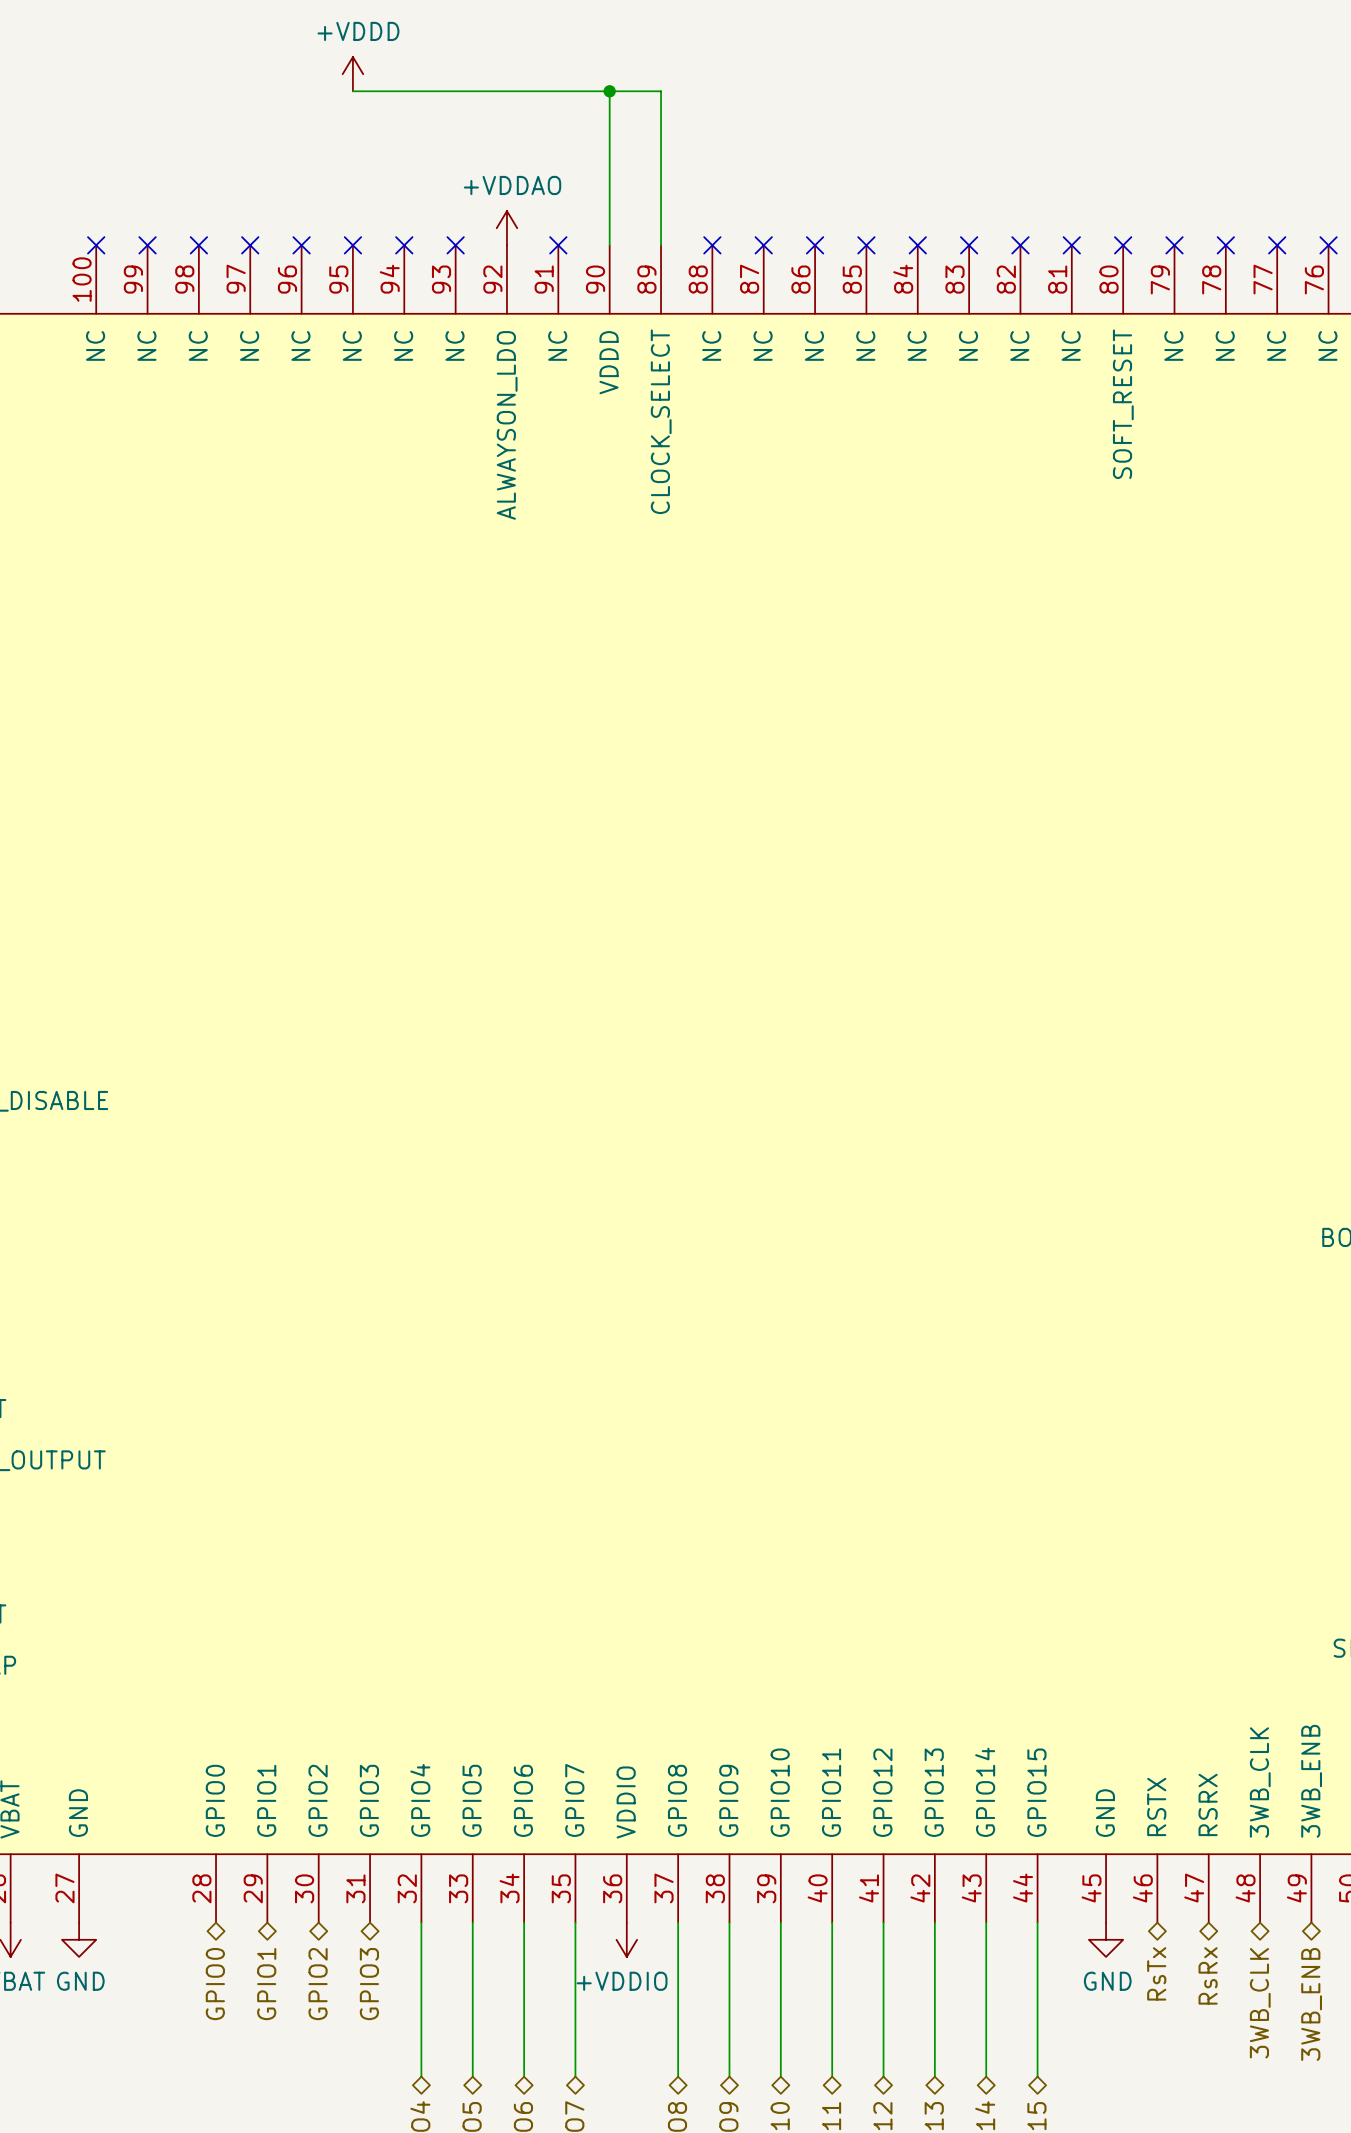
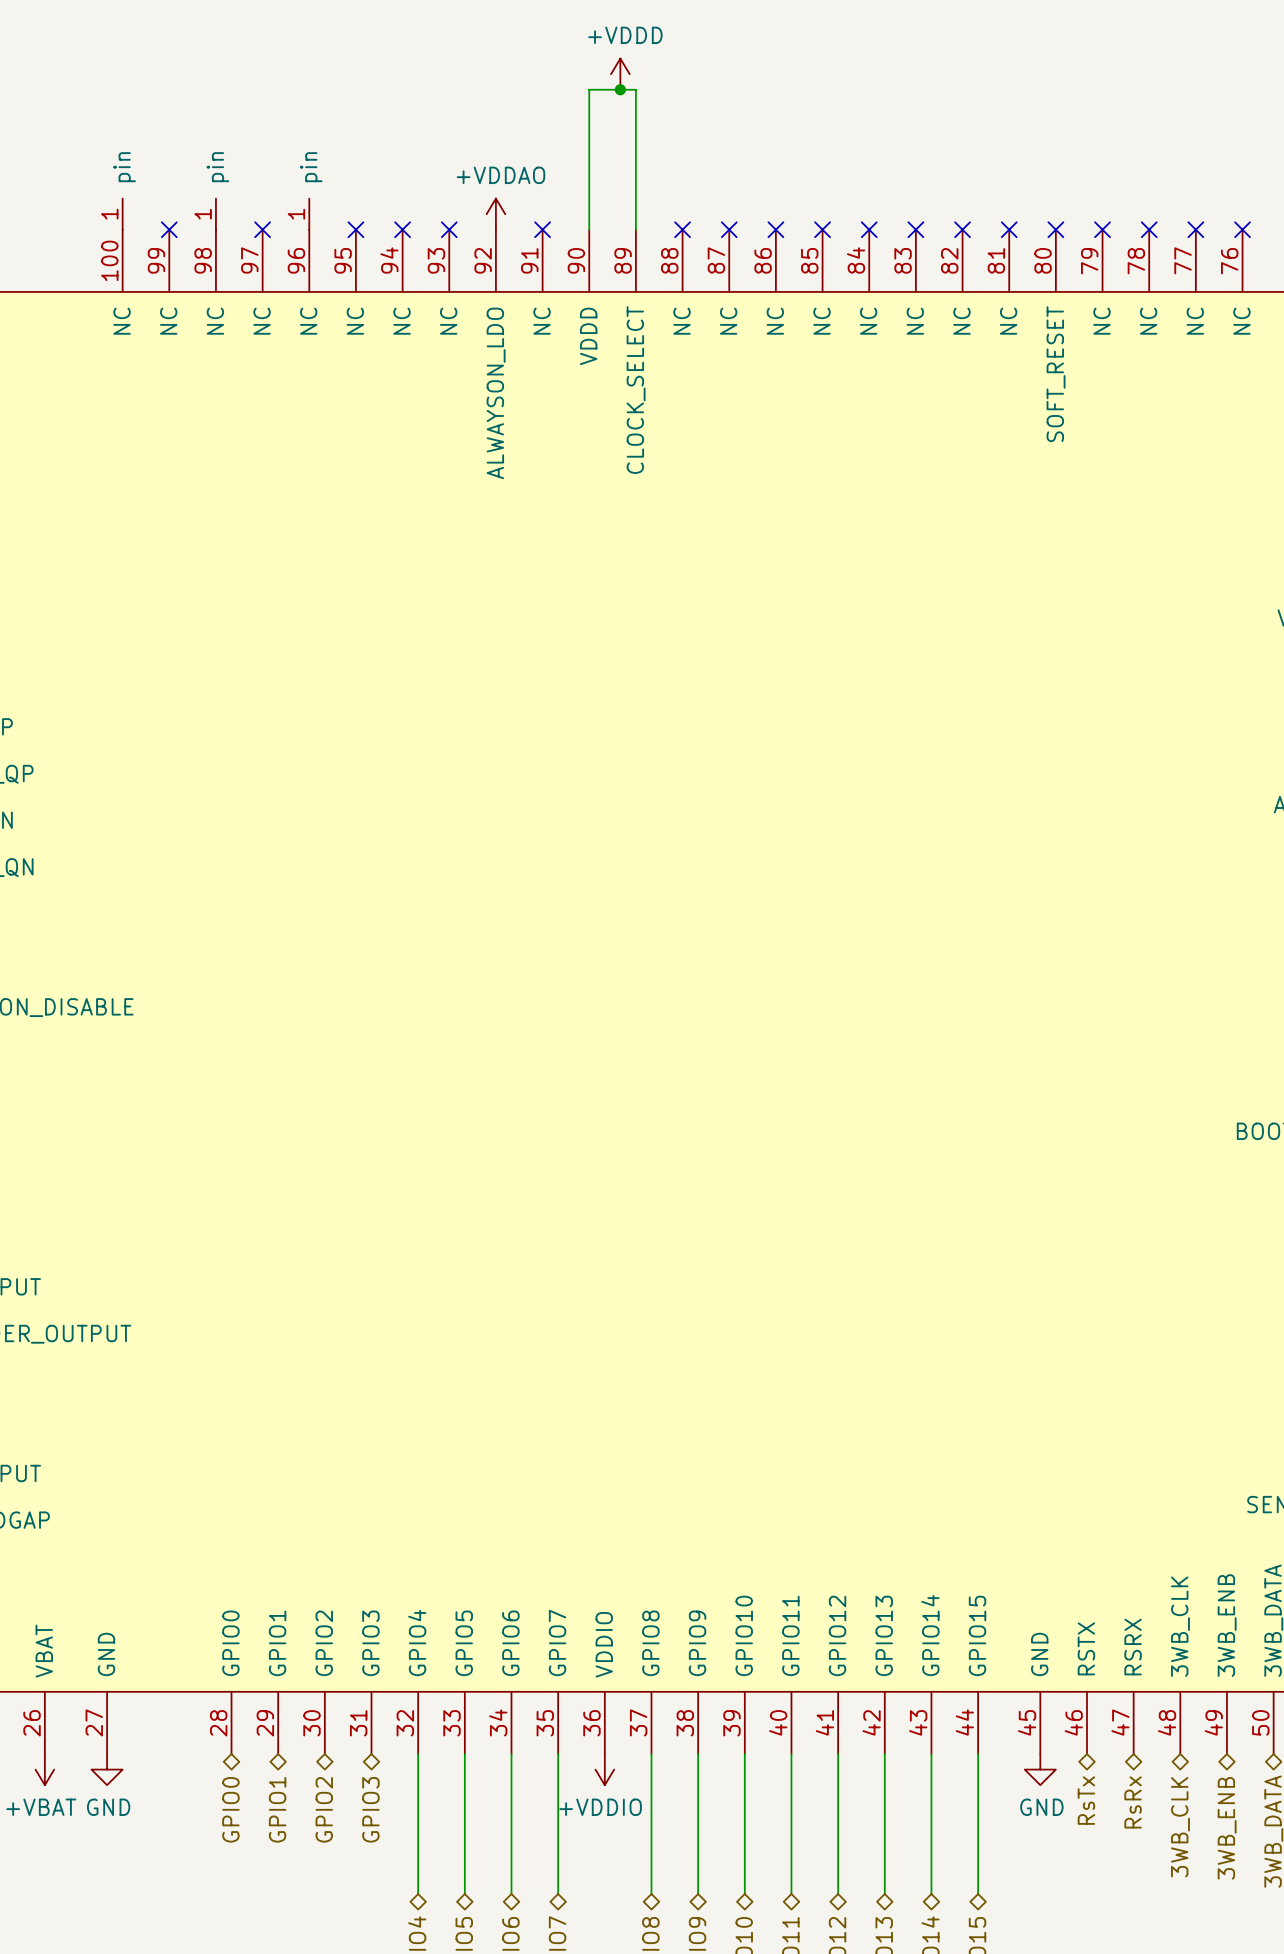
power symbol position: +VDDD (352, 74) -> +VDDD (620, 74)
wire: (352, 91) (609, 91) -> none
junction position: (609, 91) -> (620, 89)
part: none -> (122, 214)
part: none -> (215, 214)
part: none -> (309, 214)
no-connect mark: (96, 245) -> none
no-connect mark: (198, 245) -> none
no-connect mark: (301, 245) -> none

